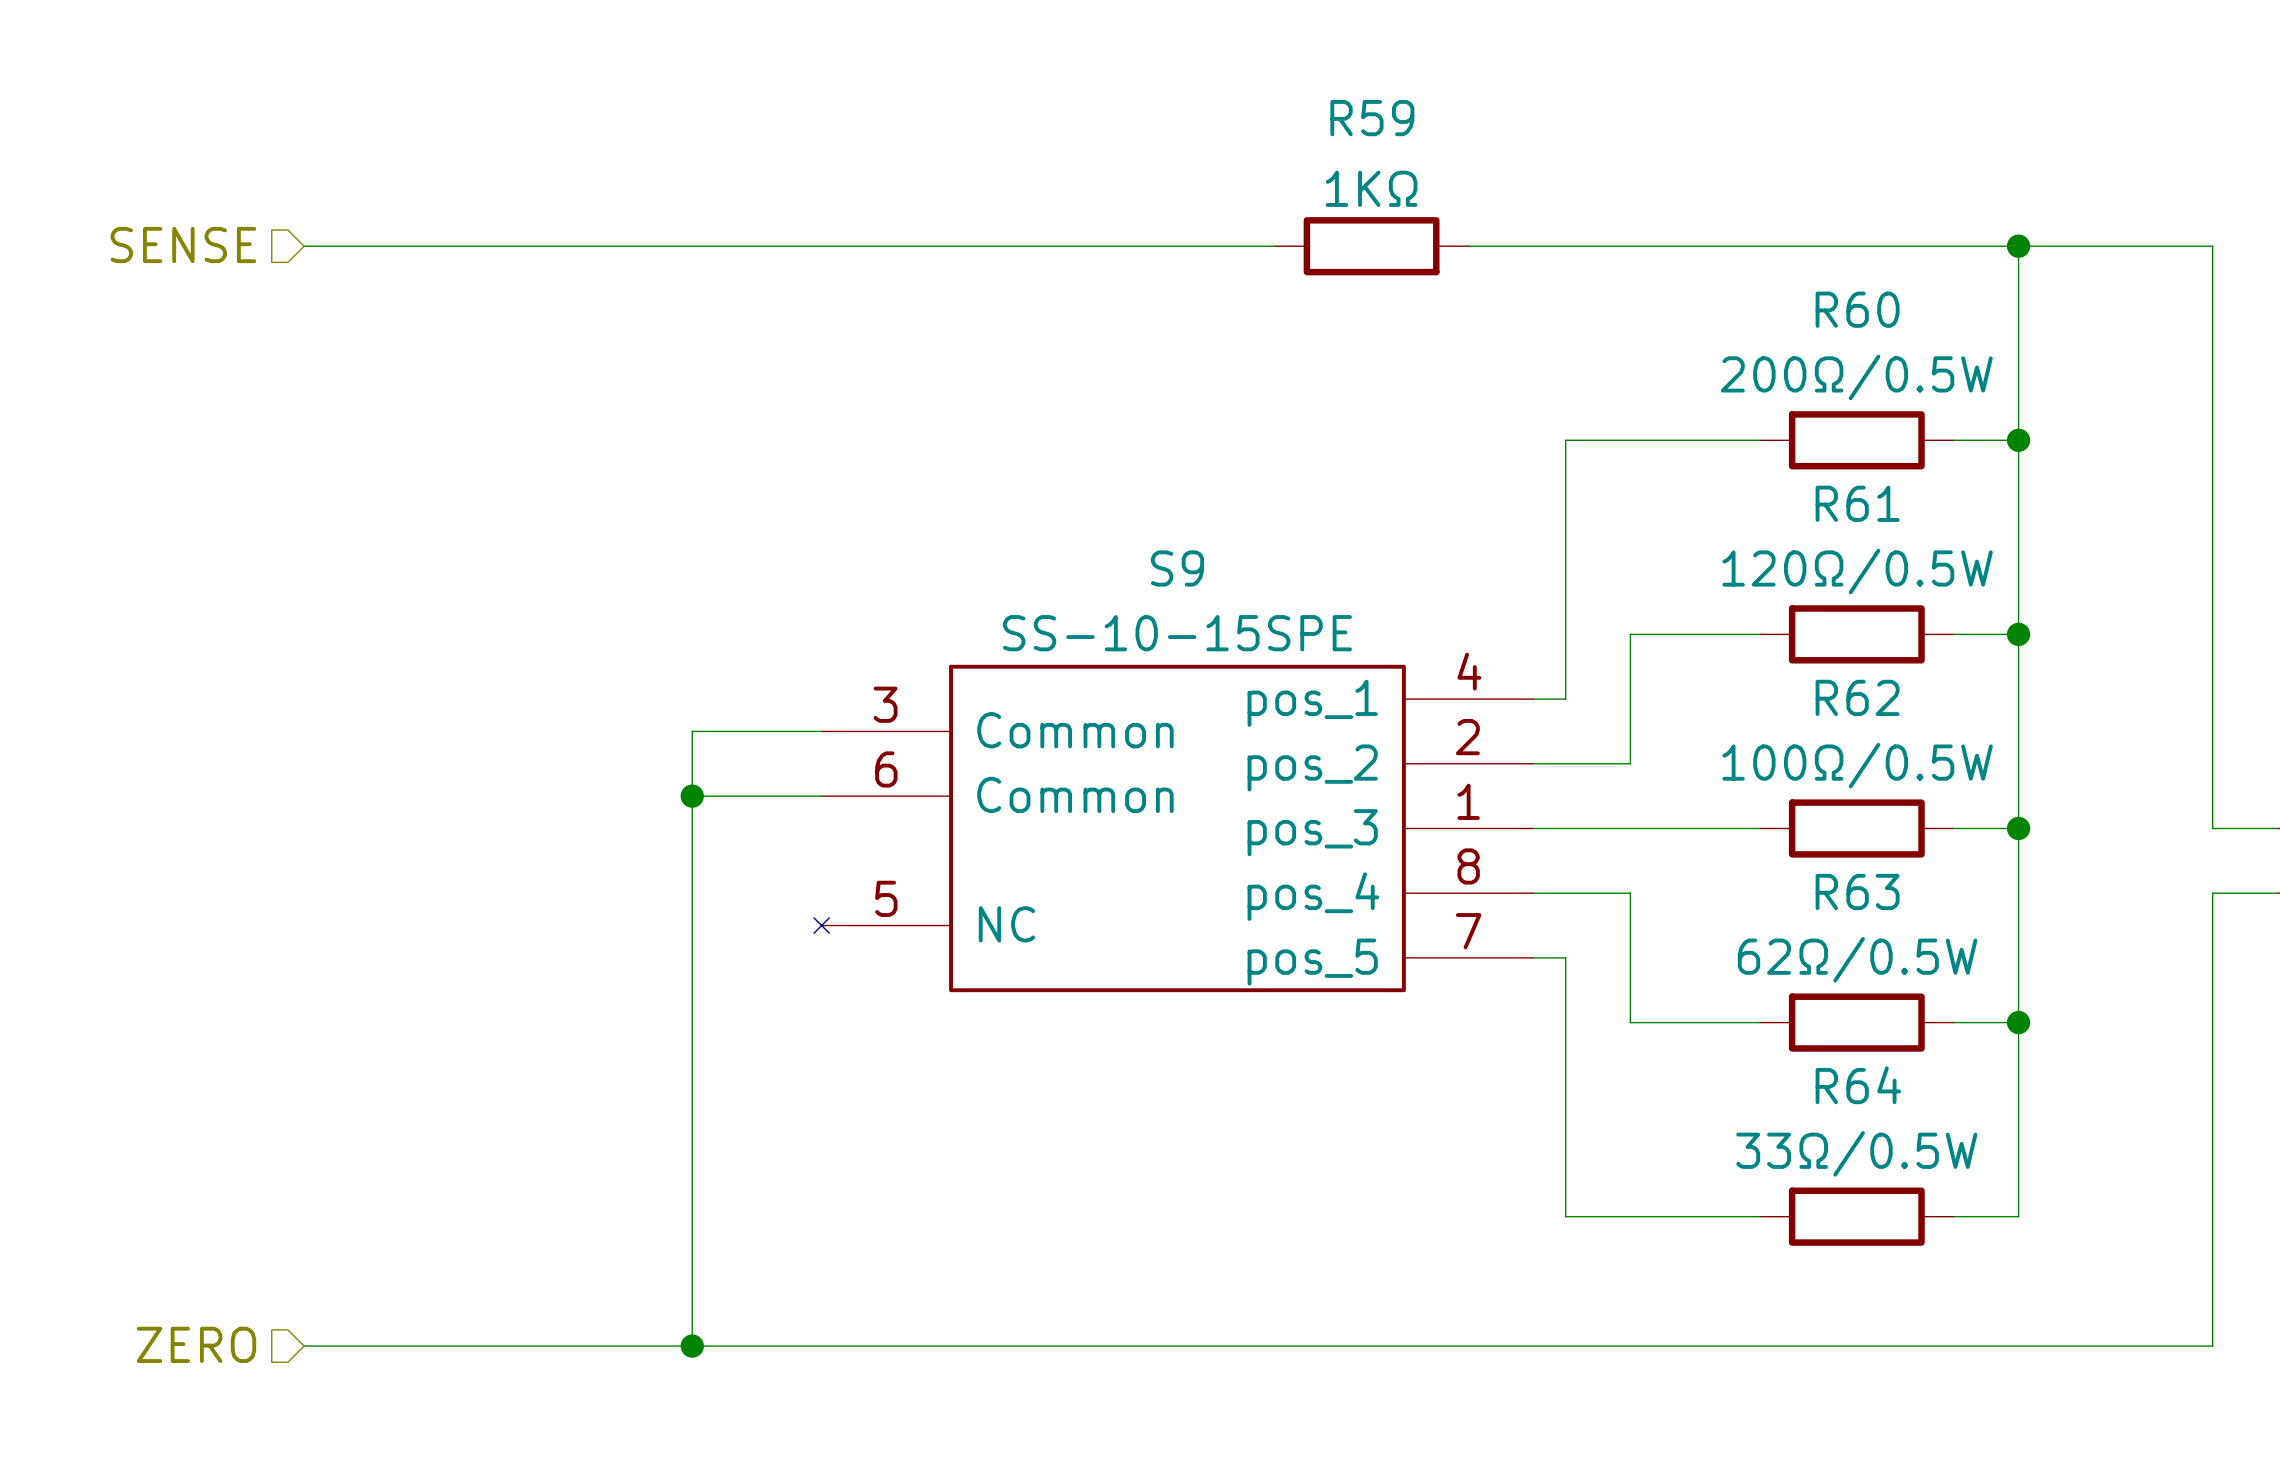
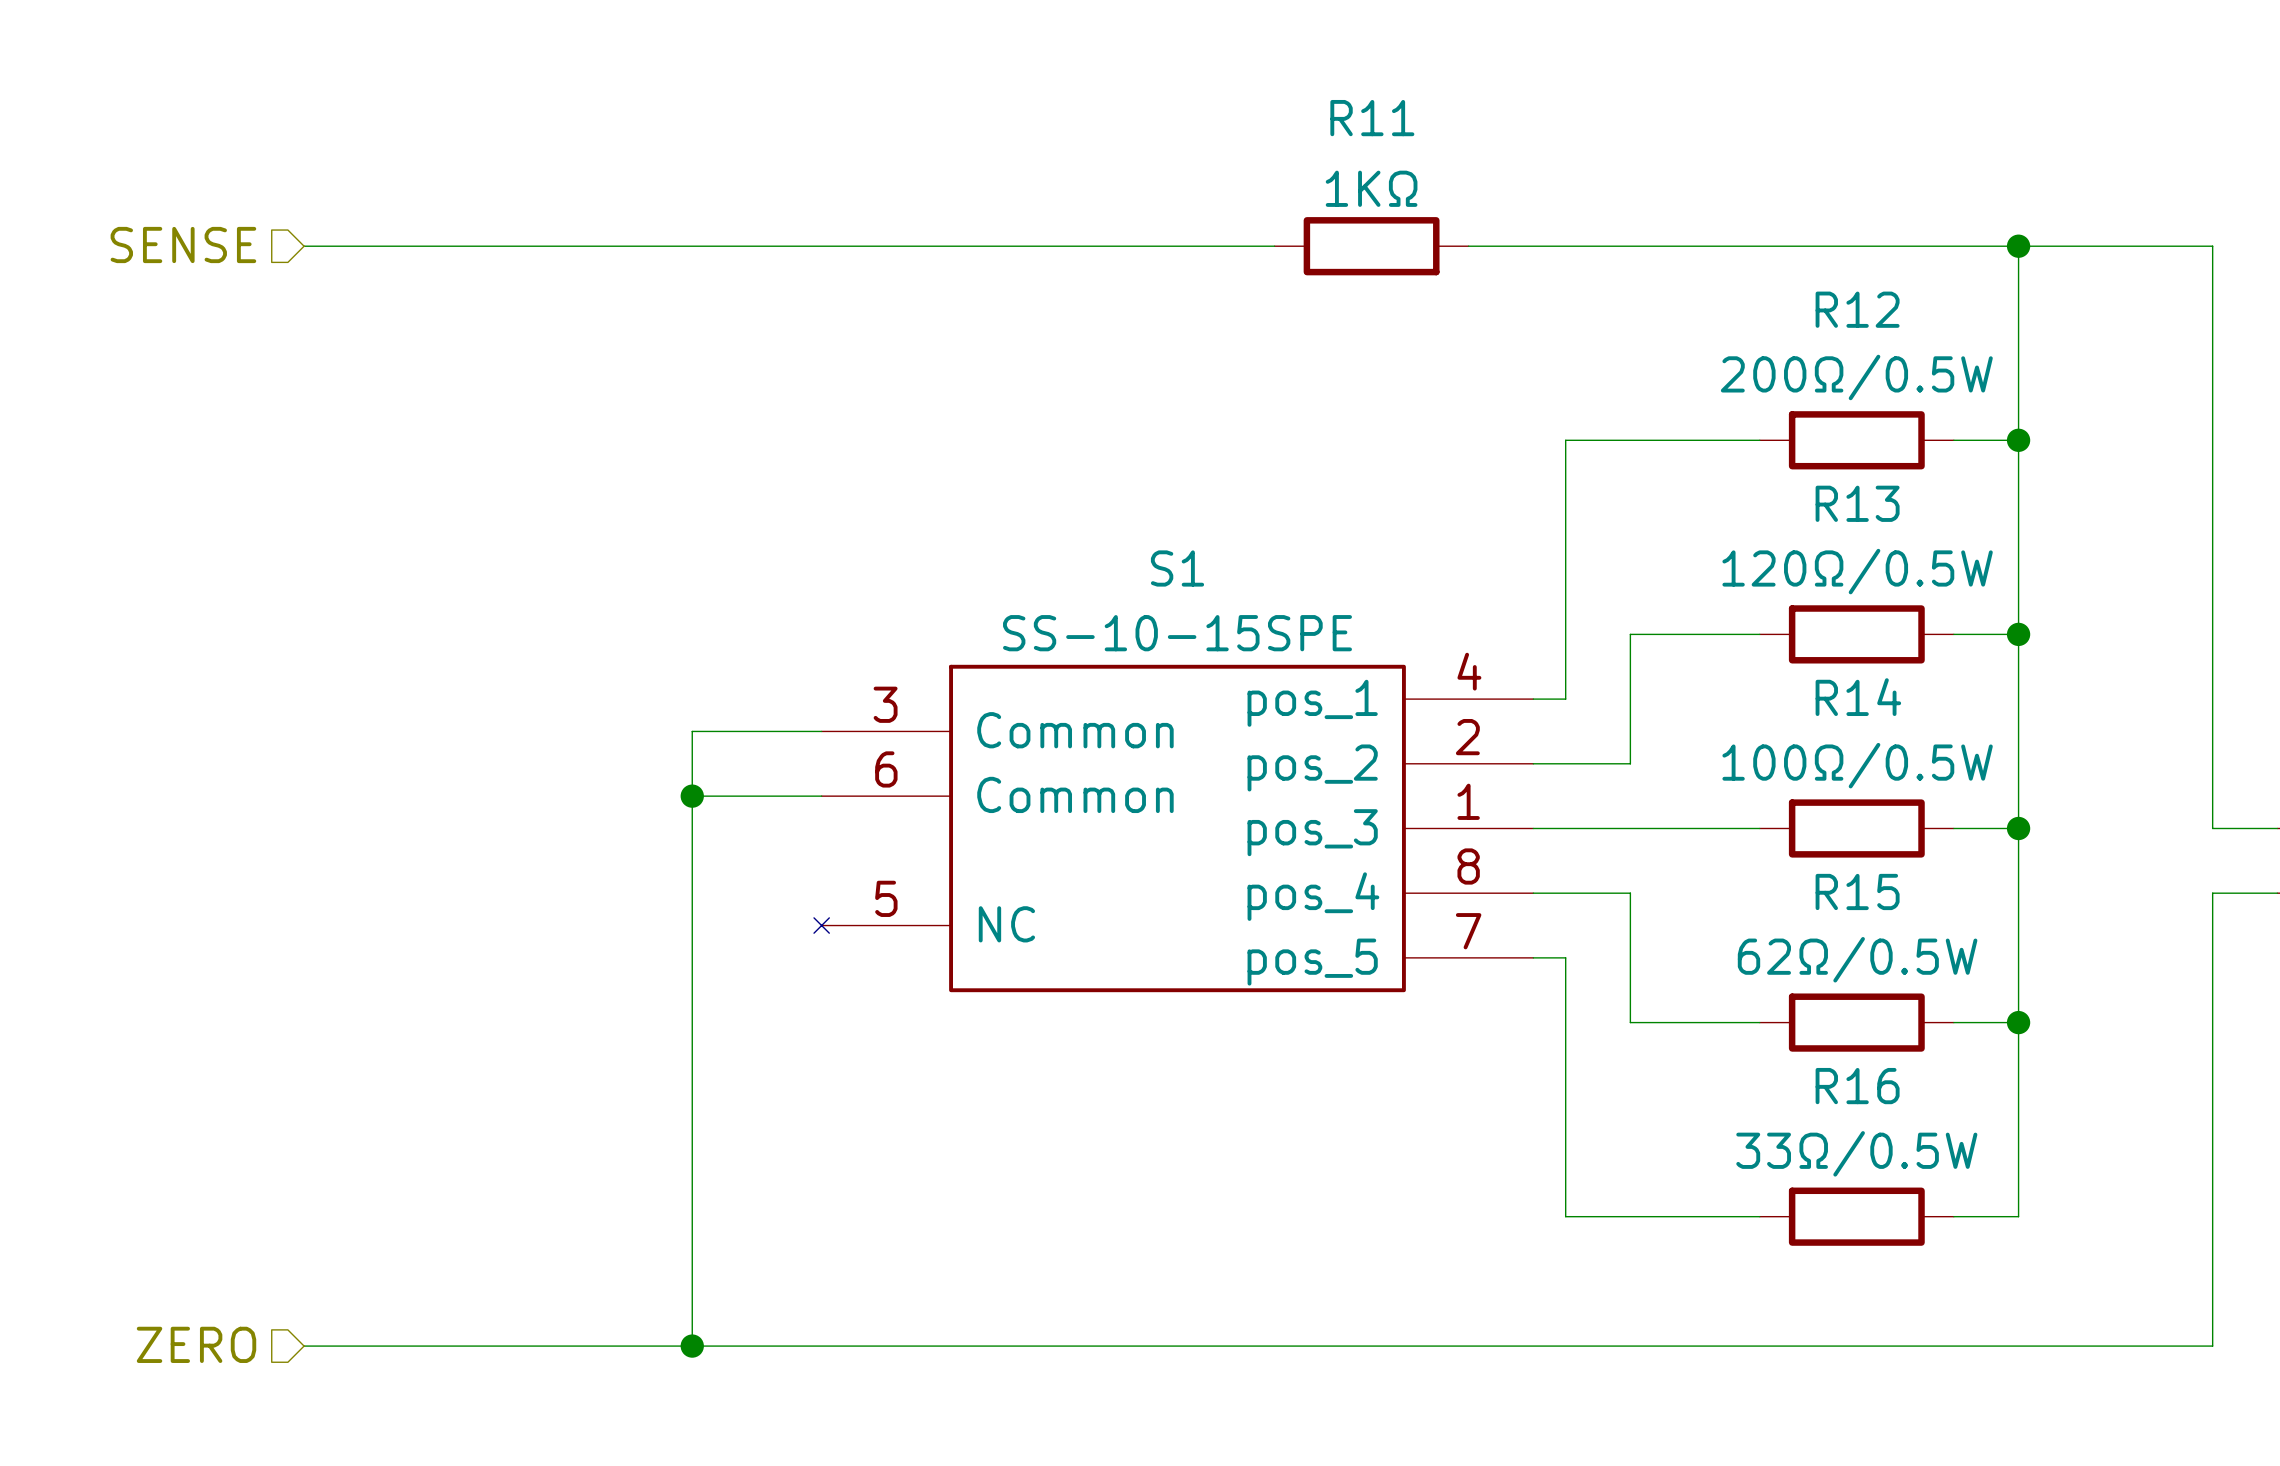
R59 name: R59 (1372, 118) -> R11 (1372, 118)
R60 name: R60 (1857, 309) -> R12 (1857, 309)
R61 name: R61 (1857, 503) -> R13 (1857, 503)
S9 name: S9 (1177, 568) -> S1 (1177, 568)
R62 name: R62 (1857, 697) -> R14 (1858, 697)
R63 name: R63 (1857, 891) -> R15 (1857, 891)
R64 name: R64 (1858, 1085) -> R16 (1857, 1086)

